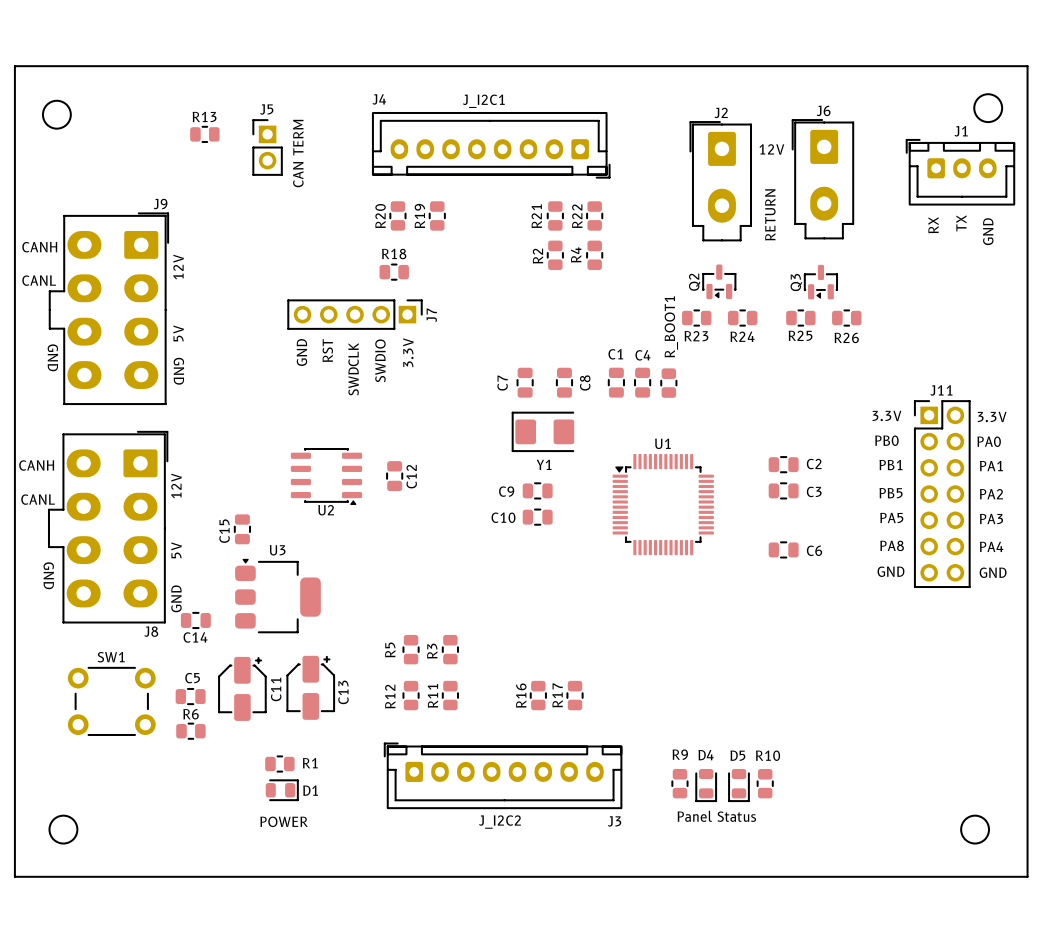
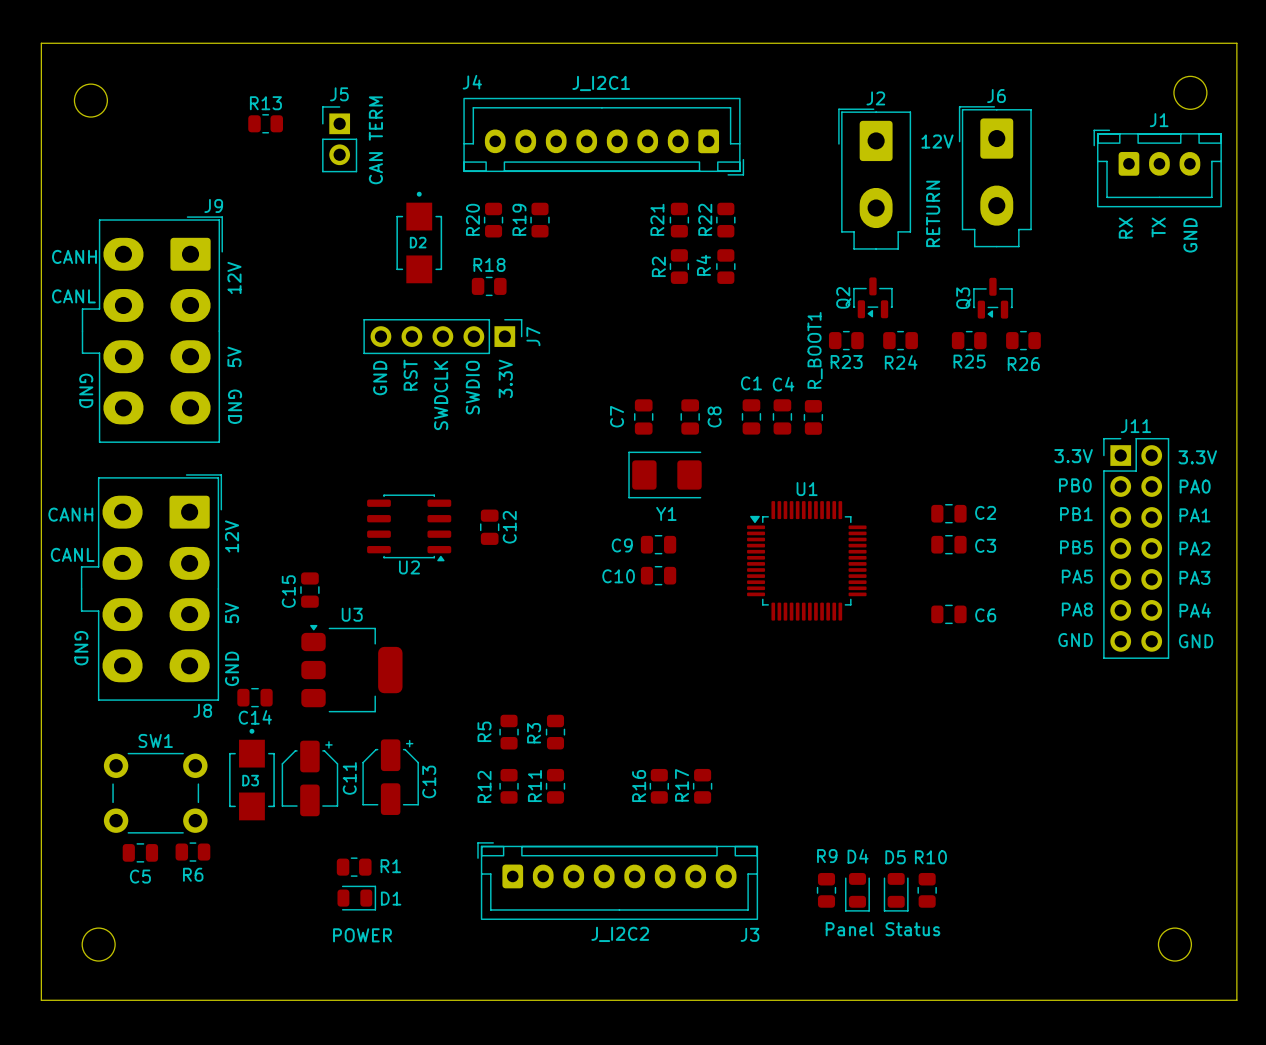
D2: none -> (419, 237)
C5 name position: C5 (192, 678) -> C5 (140, 876)
D3: none -> (251, 774)
C5 position: (190, 696) -> (140, 852)
R6 name position: R6 (191, 714) -> R6 (193, 874)
R6 position: (190, 731) -> (192, 852)

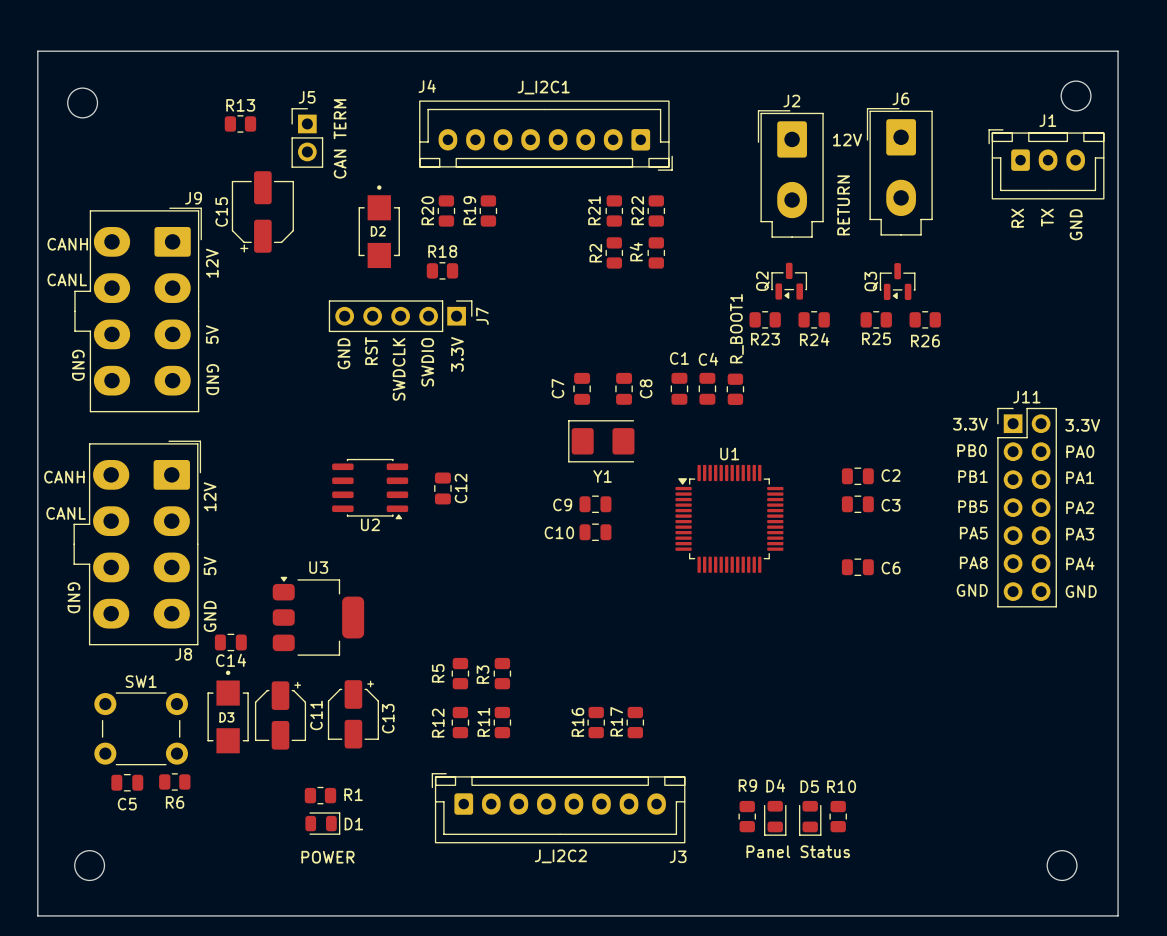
C15 footprint: [300, 572, 320, 608] -> [231, 171, 294, 253]
C15 name position: C15 (288, 591) -> C15 (221, 211)

